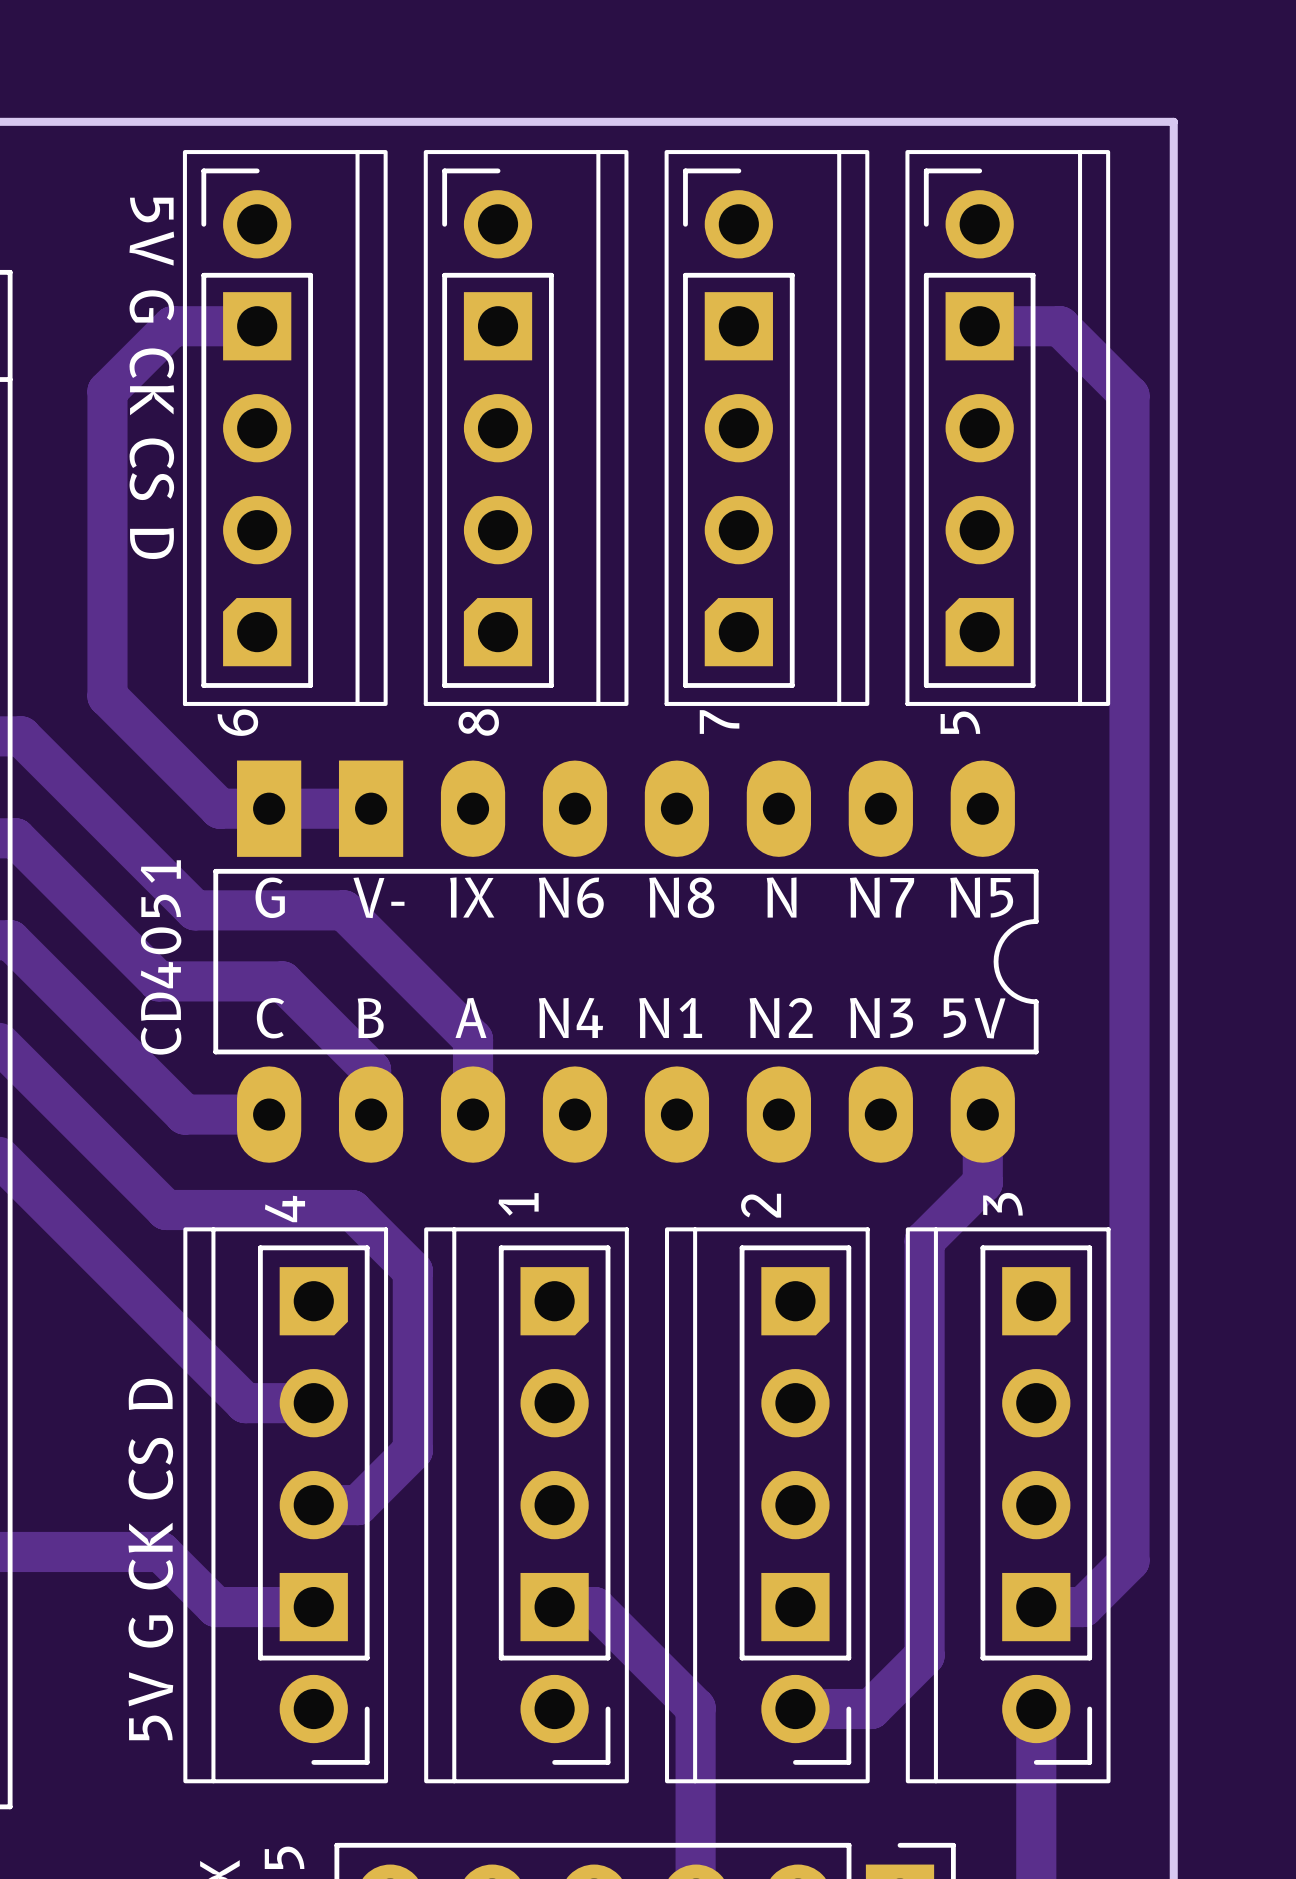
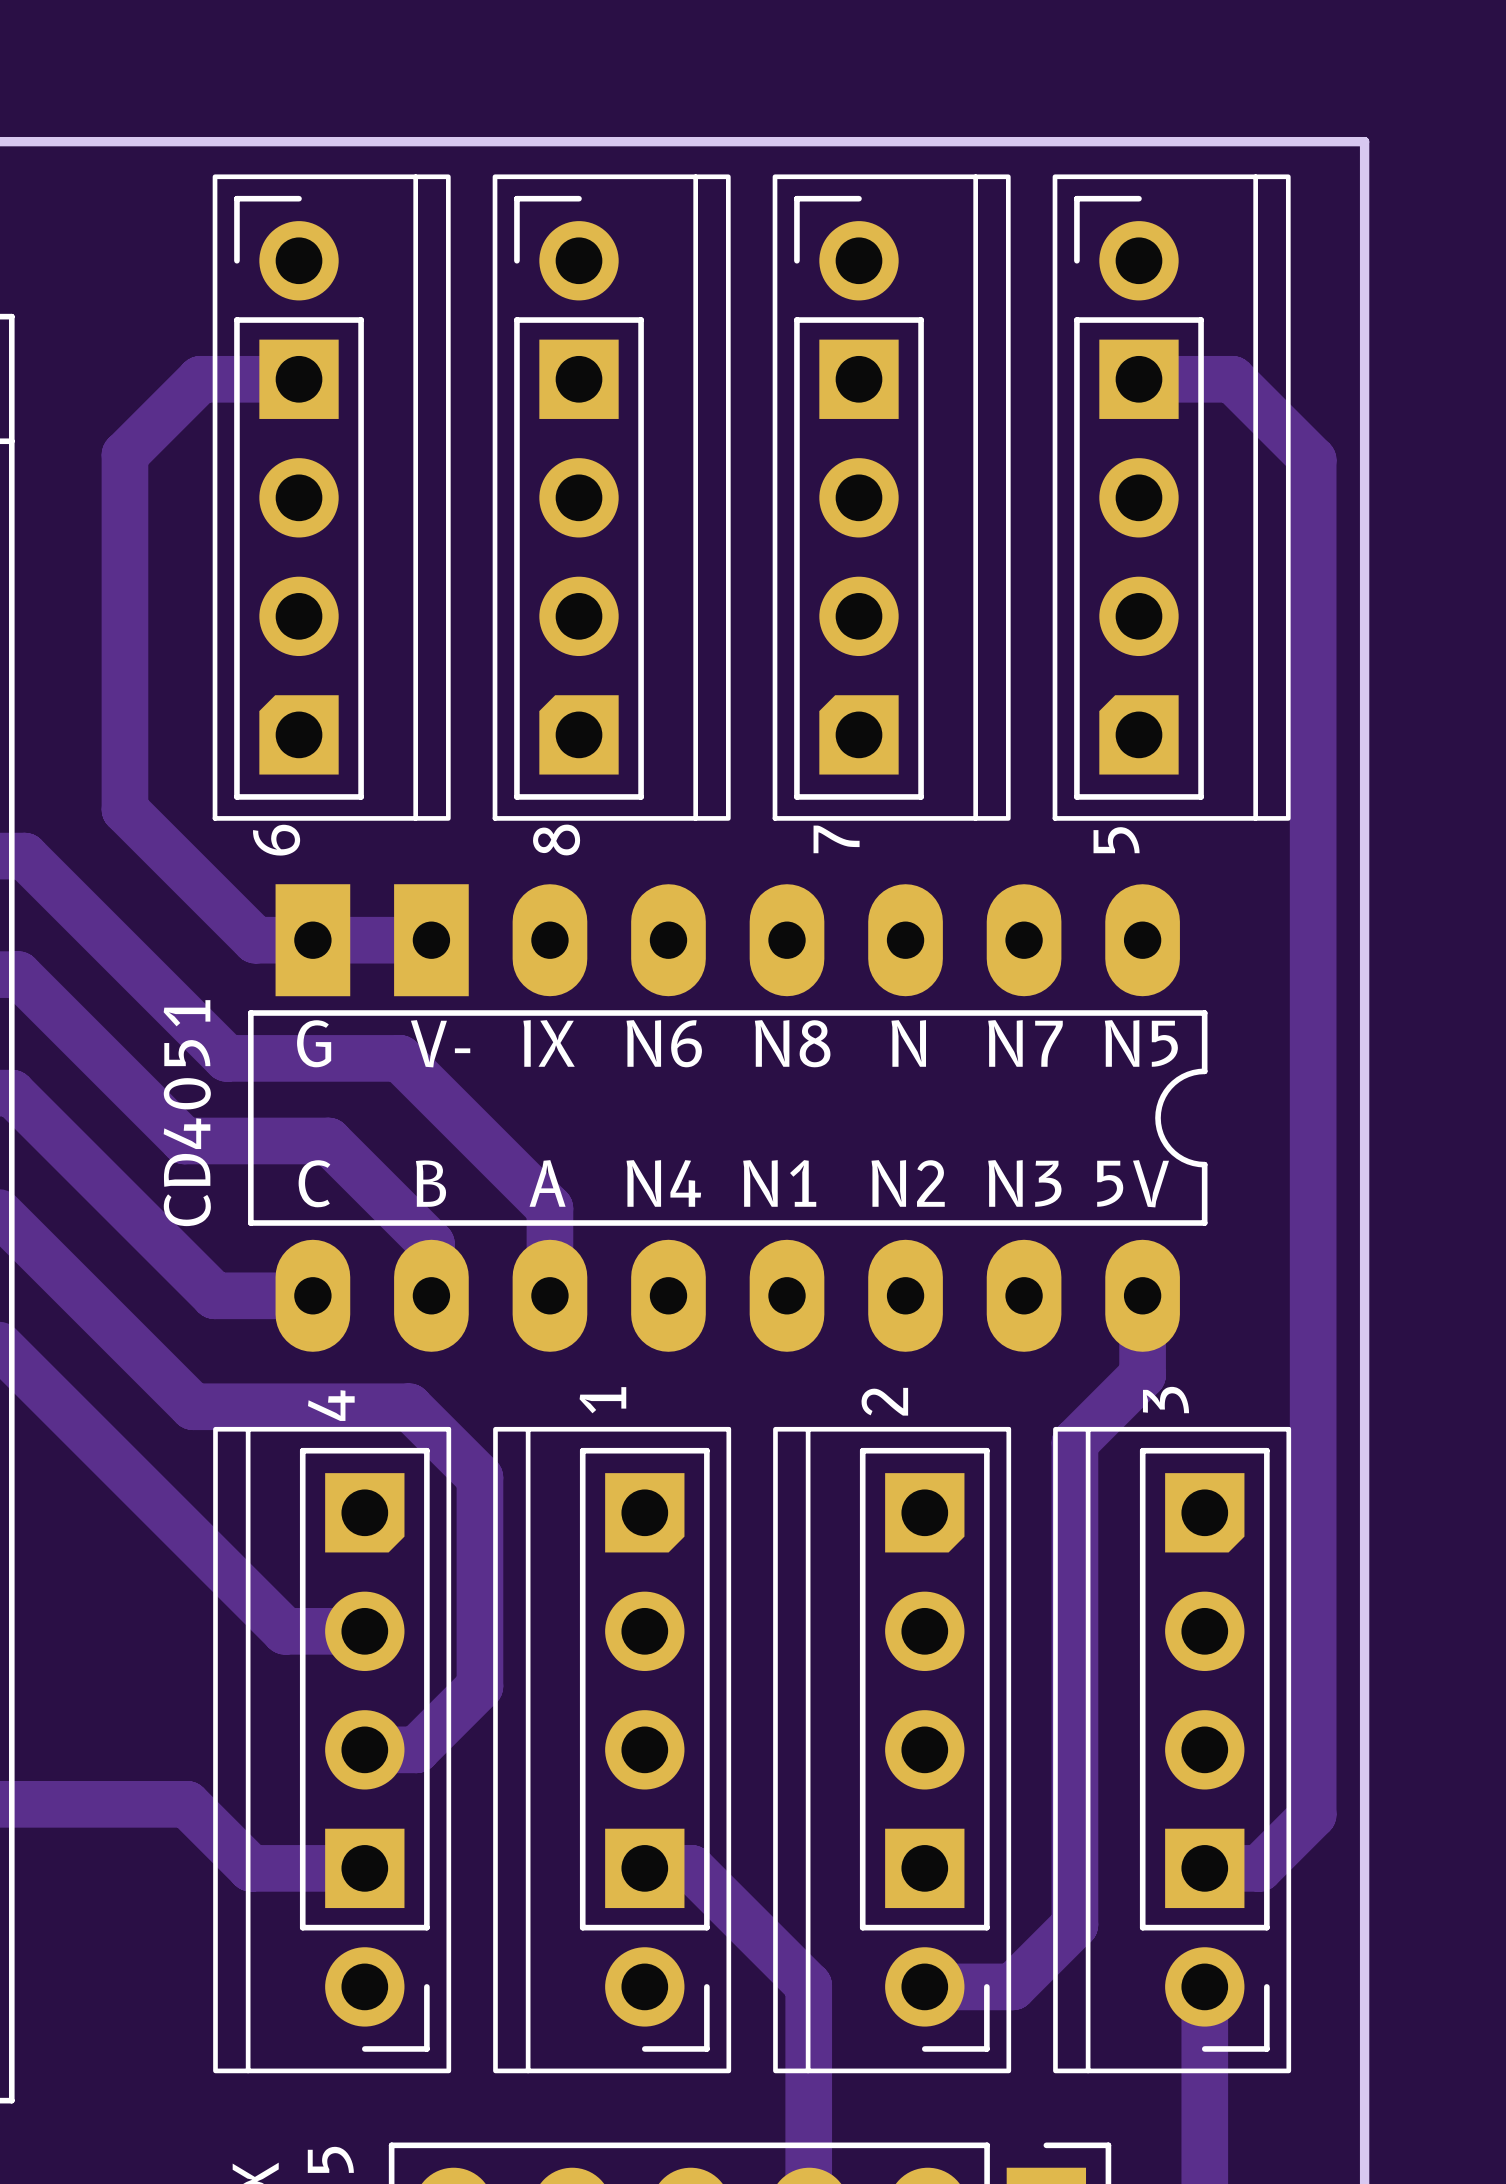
text: 5V G CK CS D (151, 378) -> none
text: 5V G CK CS D (150, 1559) -> none

